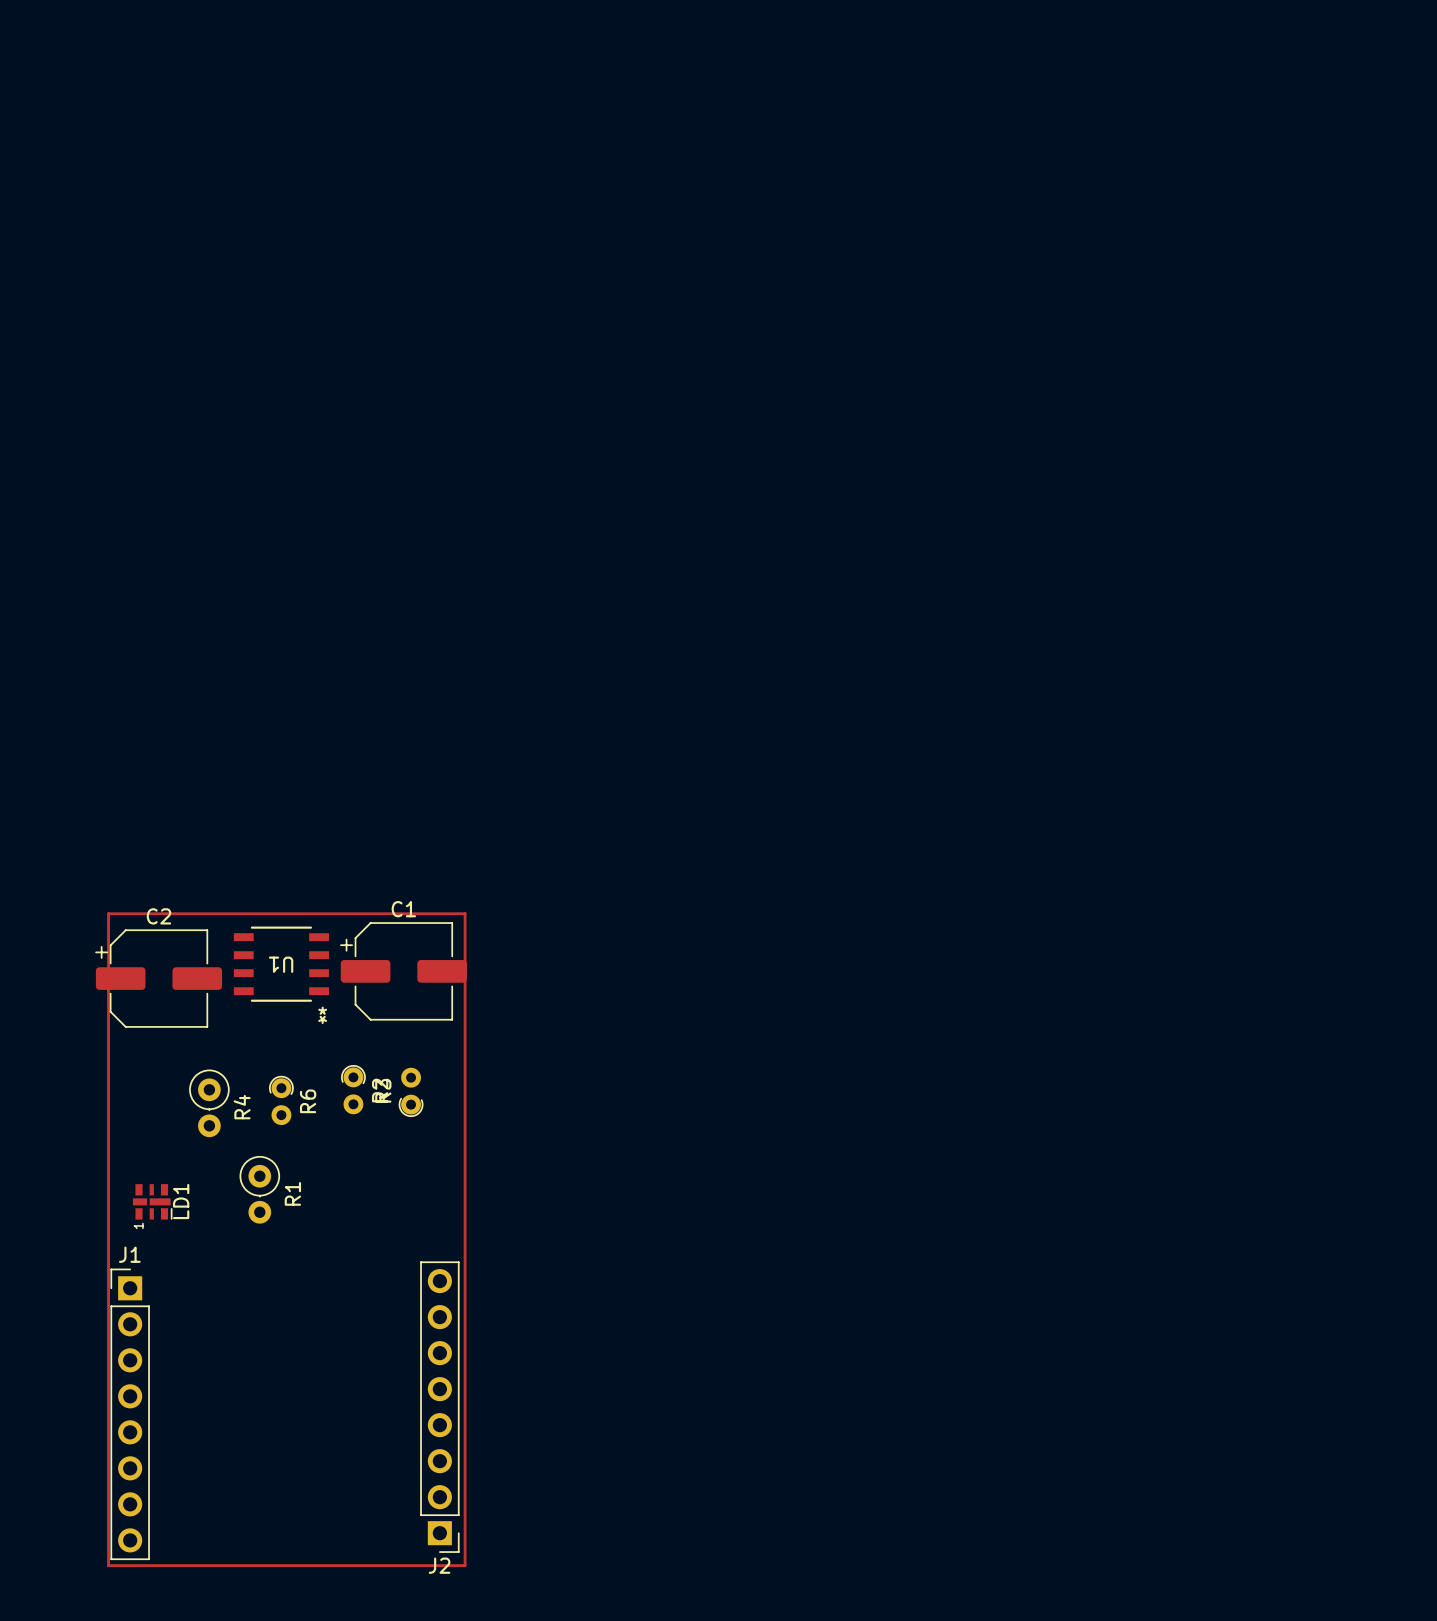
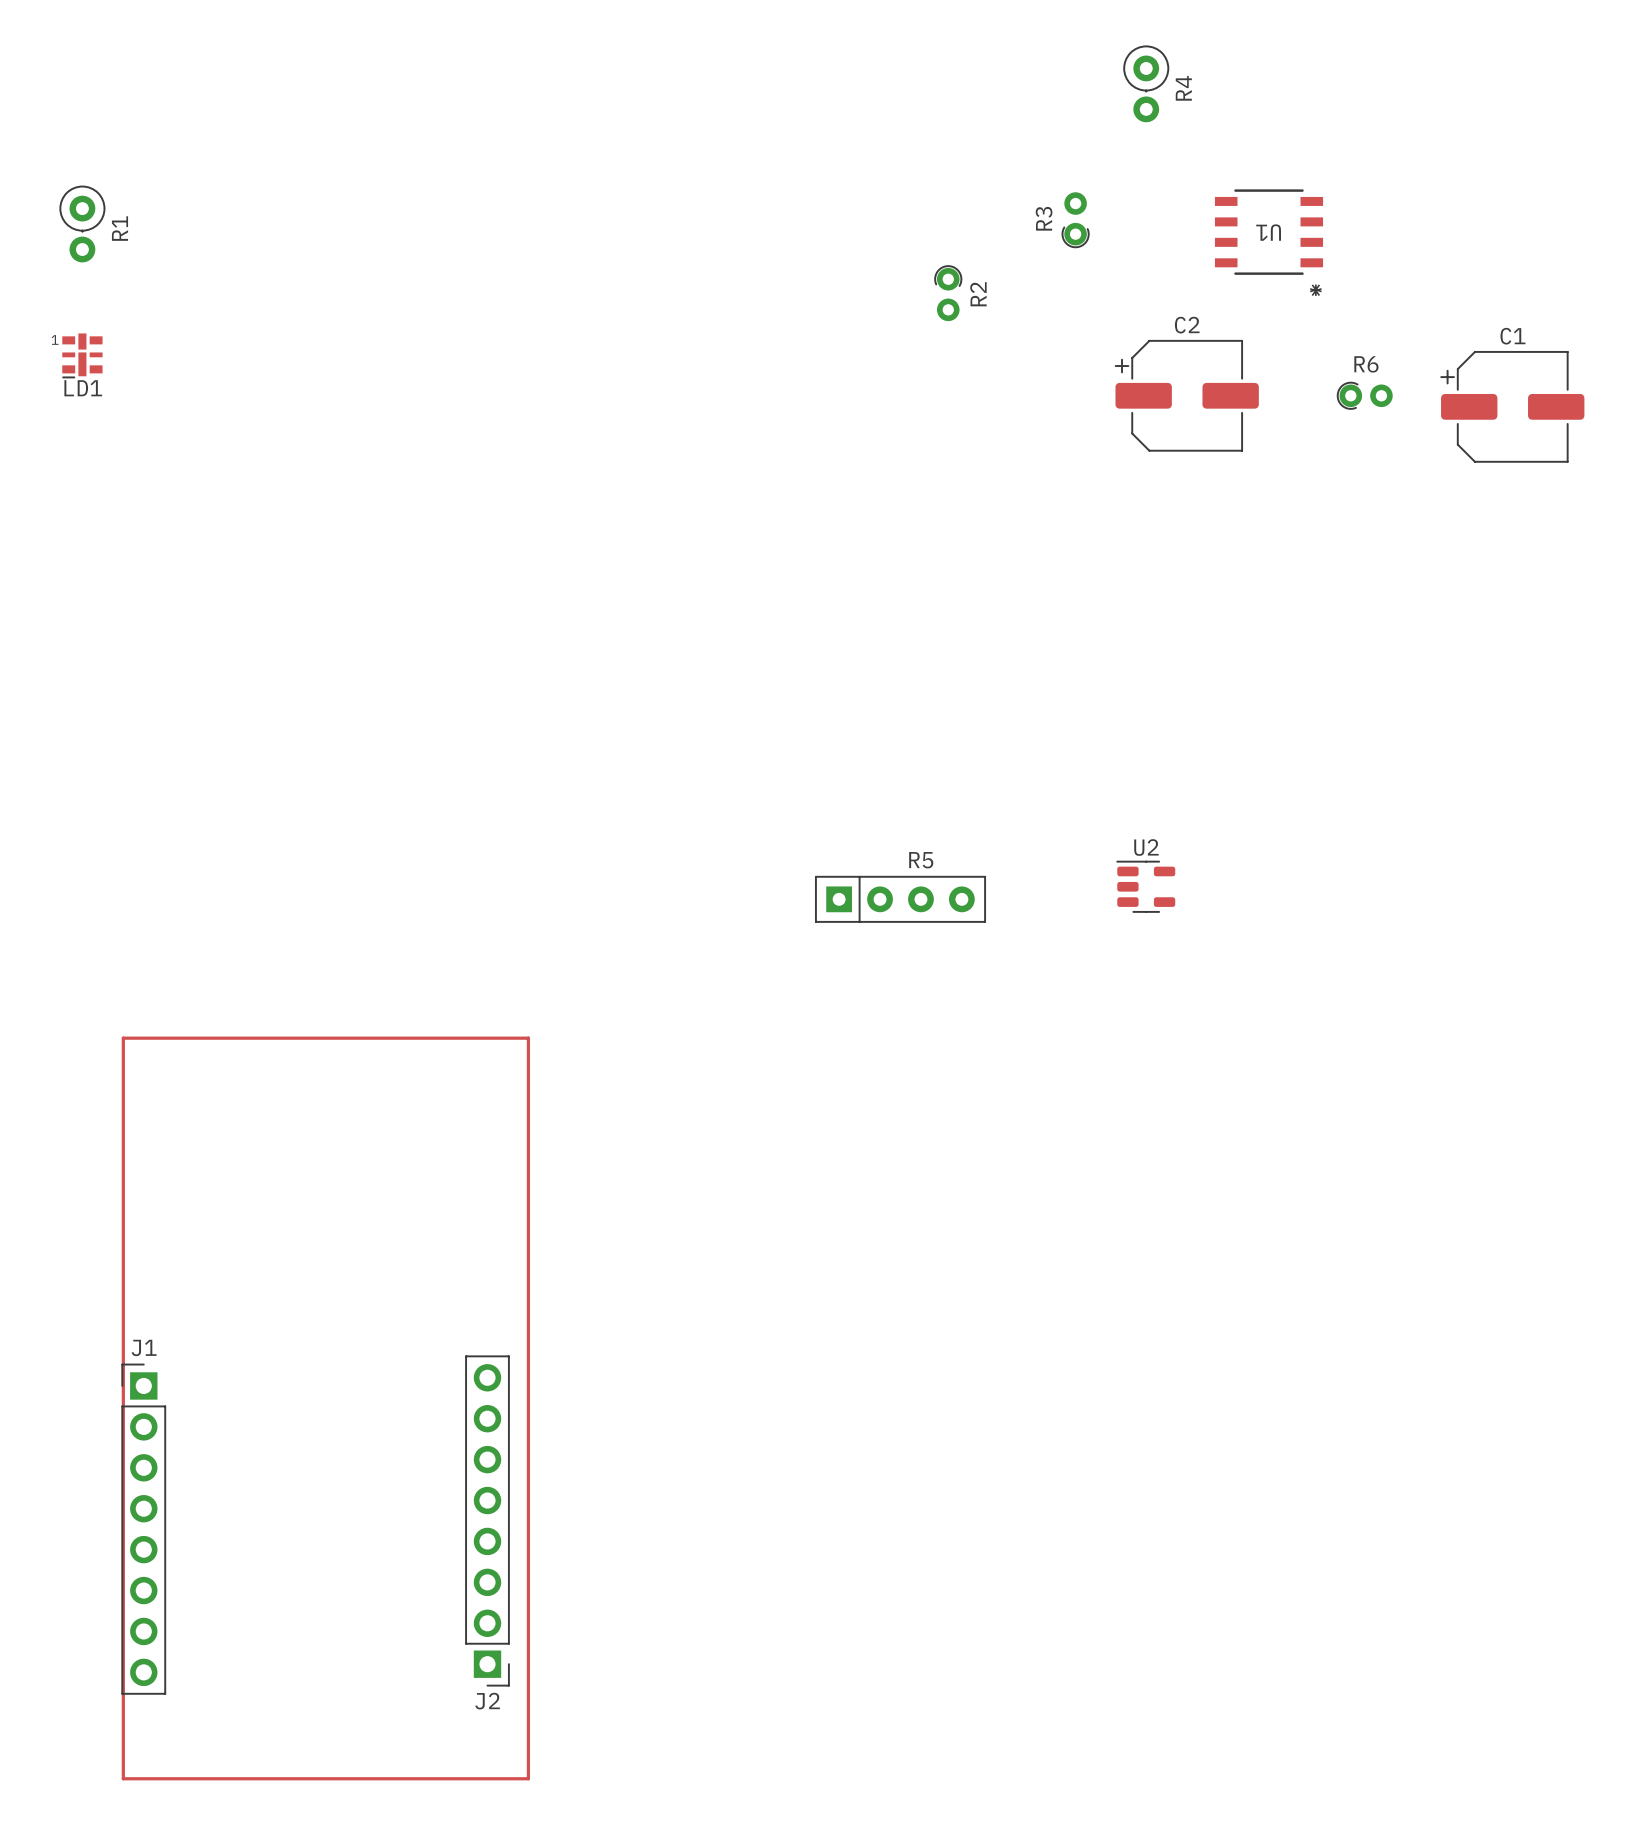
U2: none -> (1145, 886)
R5: none -> (900, 899)
U1 position: (281, 964) -> (1268, 232)
C1 position: (403, 971) -> (1512, 406)
C2 position: (158, 978) -> (1186, 395)
R2 position: (353, 1089) -> (948, 293)
R3 position: (411, 1092) -> (1075, 220)
R6 rotation: 0° (281, 1100) -> 90° counterclockwise (1364, 395)
R6 position: (281, 1100) -> (1364, 395)
R4 position: (209, 1103) -> (1146, 83)
R1 position: (259, 1189) -> (82, 223)
LD1 rotation: 0° (152, 1201) -> 90° clockwise (82, 355)
LD1 position: (152, 1201) -> (82, 355)
J2 position: (439, 1407) -> (487, 1520)
J1 position: (130, 1414) -> (143, 1529)

